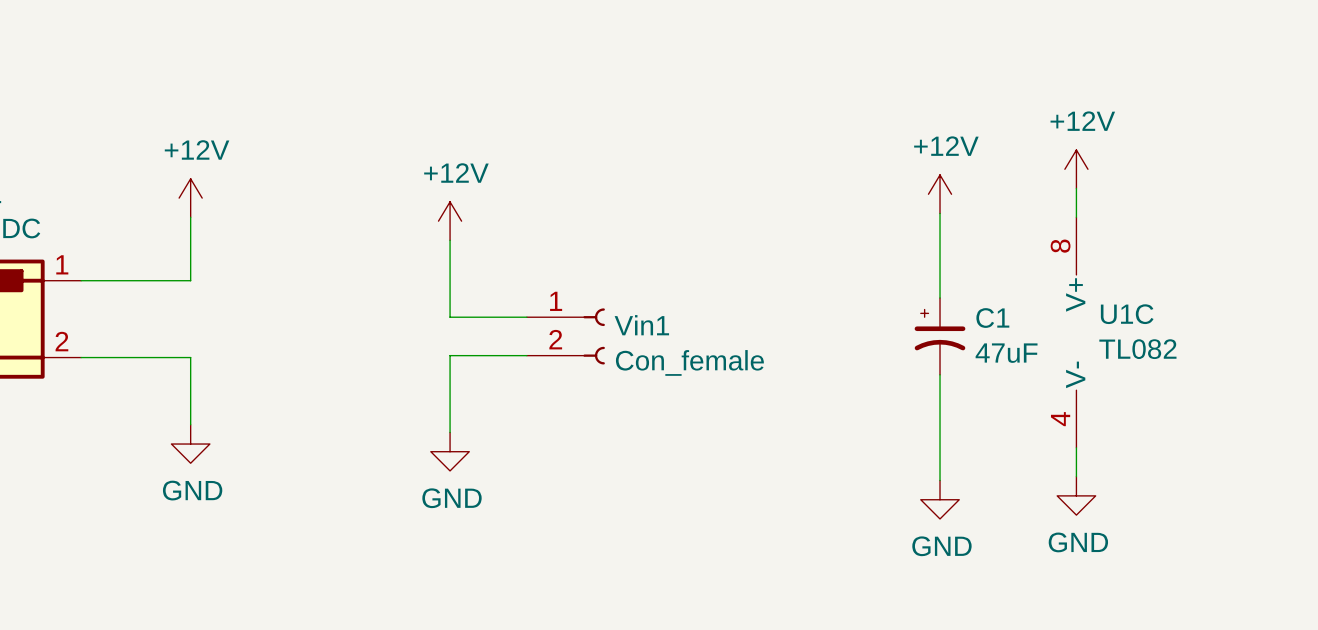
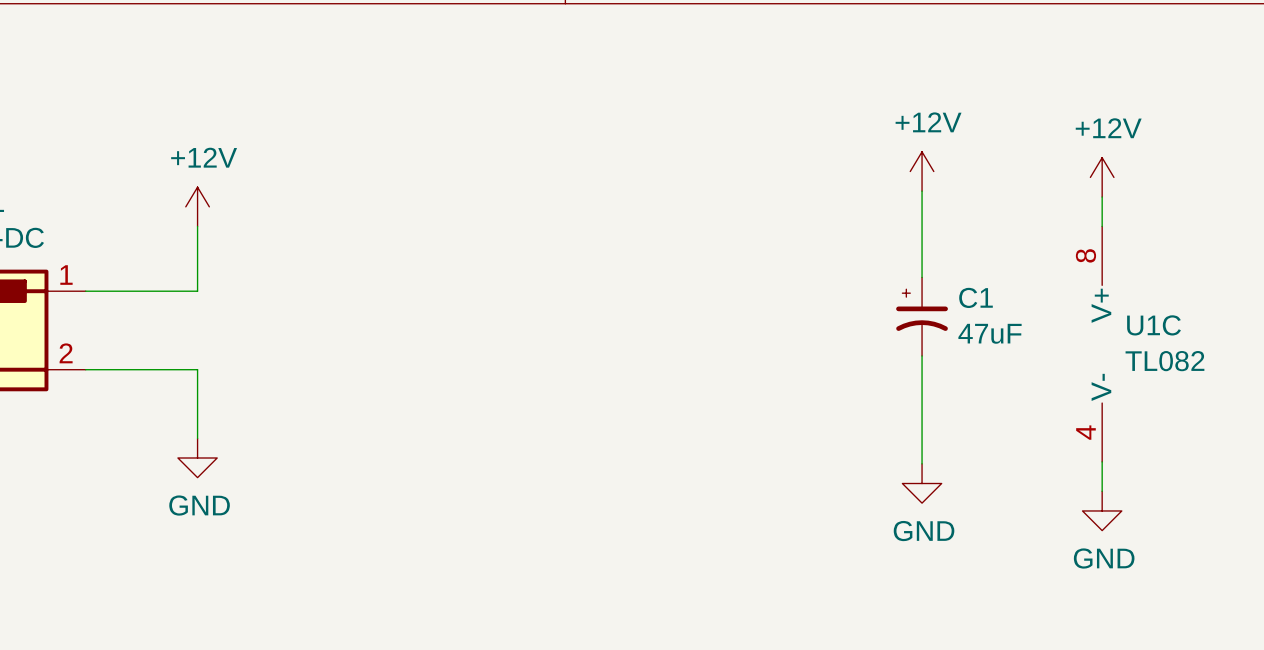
power symbol position: +12V (940, 194) -> +12V (922, 171)
wire: (940, 213) (940, 297) -> (922, 191) (922, 277)
power symbol: +12V (450, 221) -> none
wire: (450, 240) (450, 317) (526, 317) -> none
Vin1: Con_female (565, 336) -> none
C1 position: (940, 336) -> (922, 316)
wire: (526, 355) (450, 355) (450, 432) -> none
wire: (940, 374) (940, 480) -> (922, 355) (922, 463)
power symbol: GND (450, 451) -> none
power symbol position: GND (940, 499) -> GND (922, 483)

